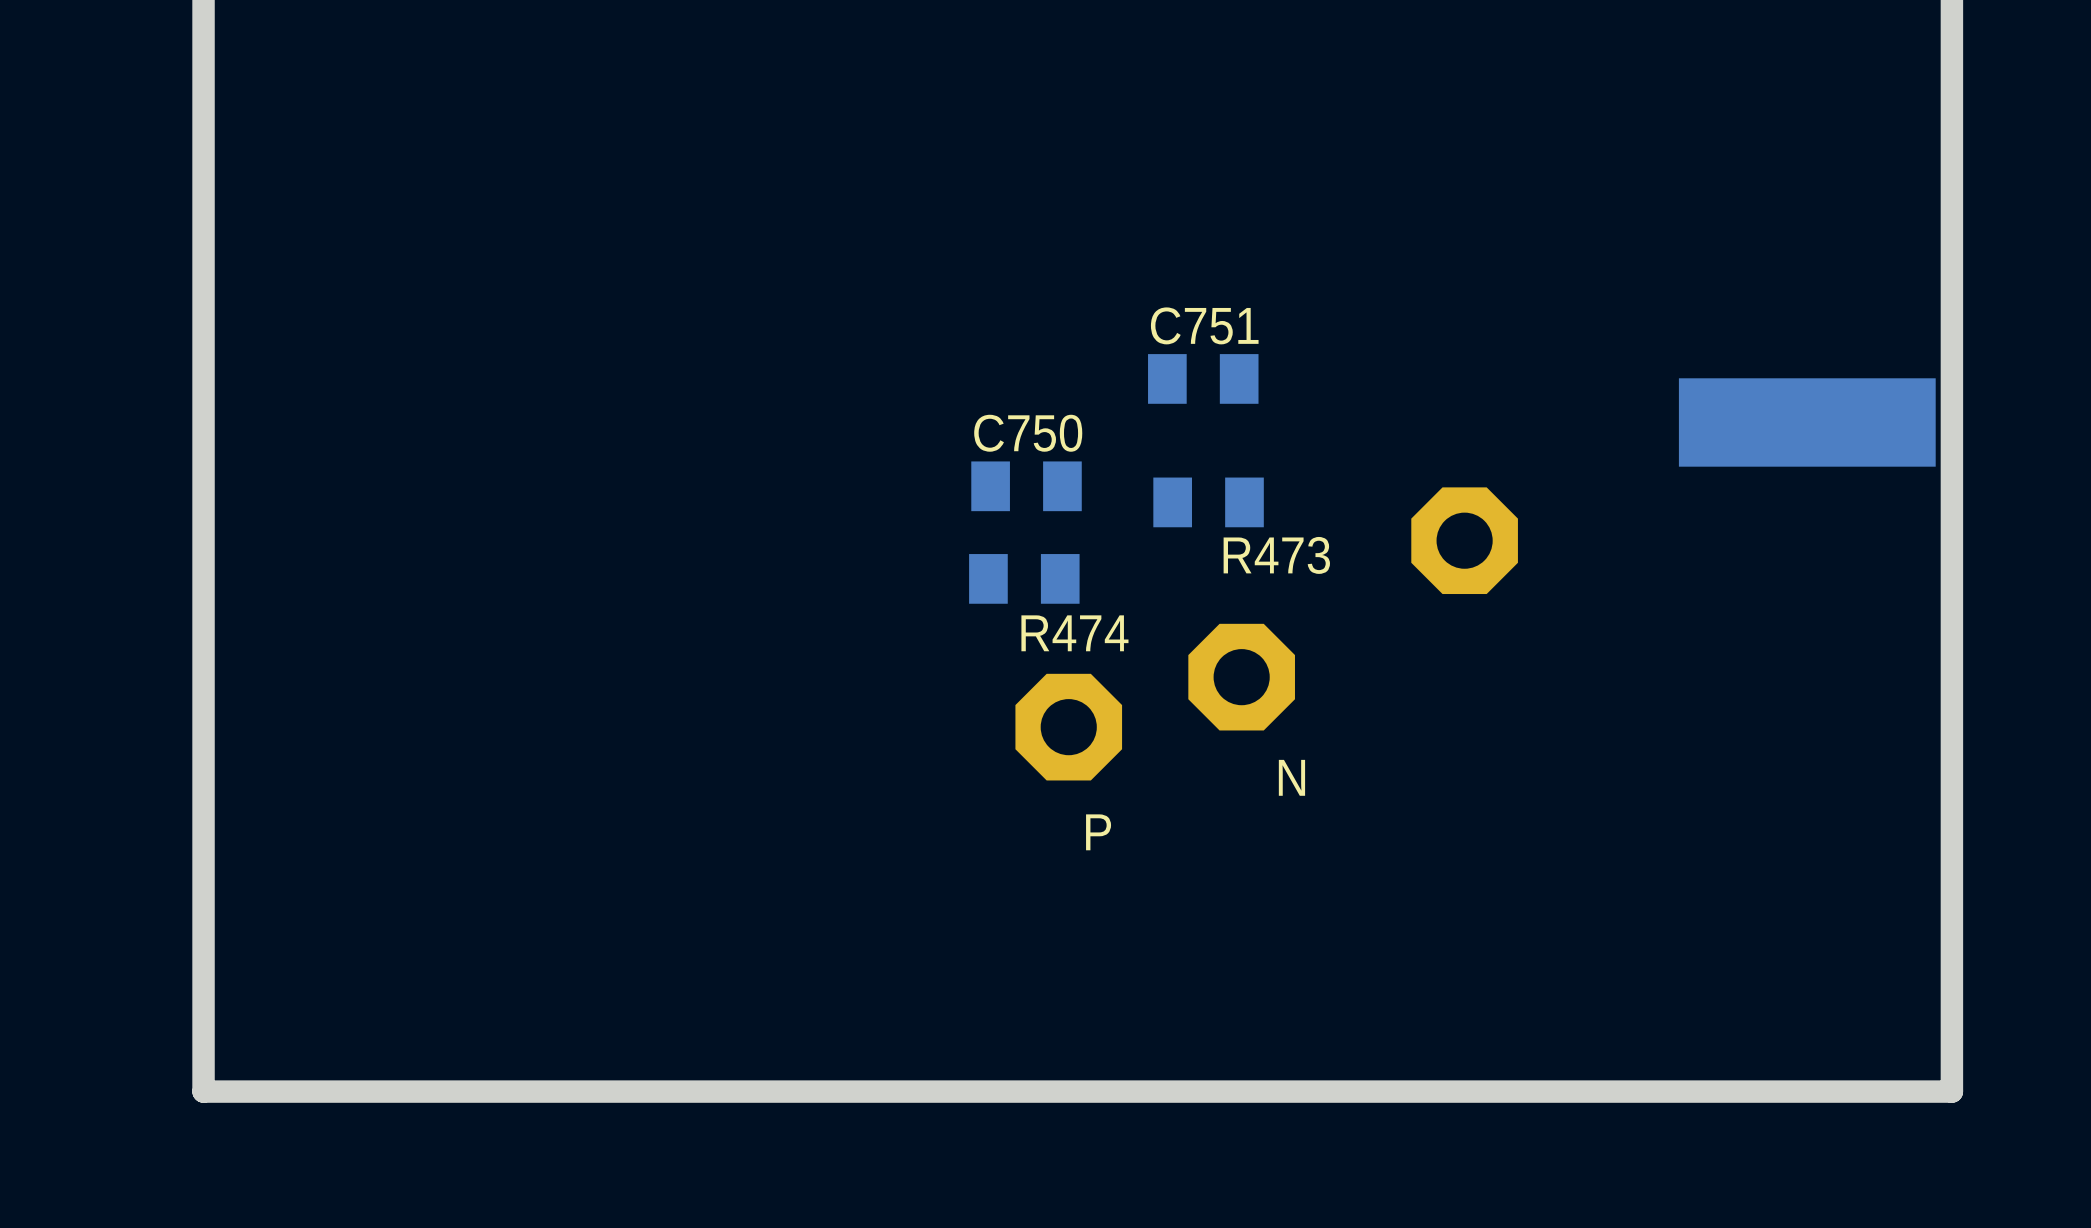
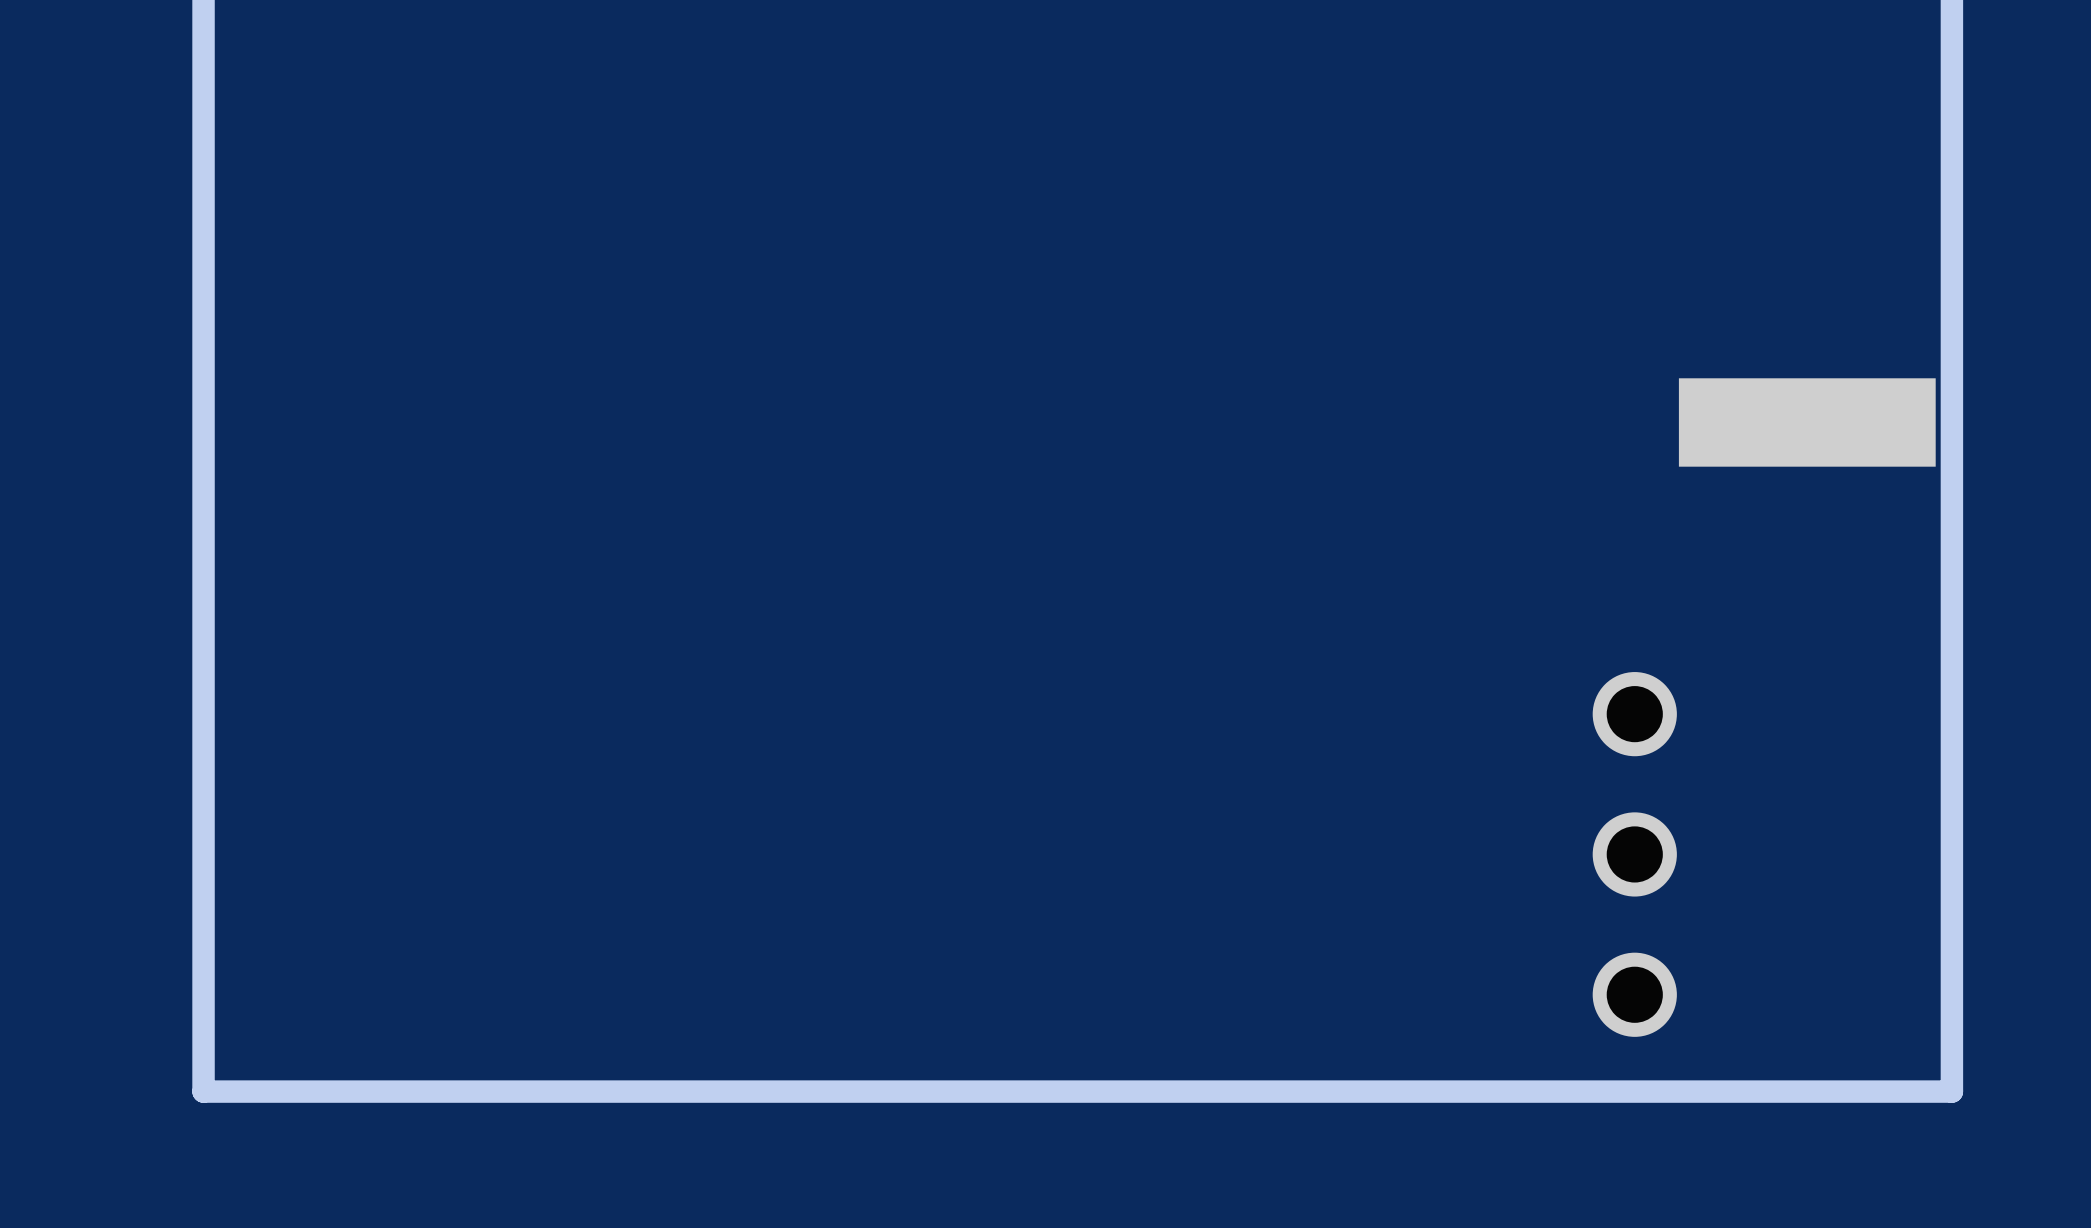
C751: (1203, 378) -> none
C750: (1026, 486) -> none
R473: (1208, 502) -> none
part: (1464, 540) -> none
R474: (1024, 578) -> none
part: (1241, 677) -> none
part: (1068, 727) -> none
text: N (1291, 777) -> none
text: P (1098, 832) -> none
part: none -> (1634, 854)

